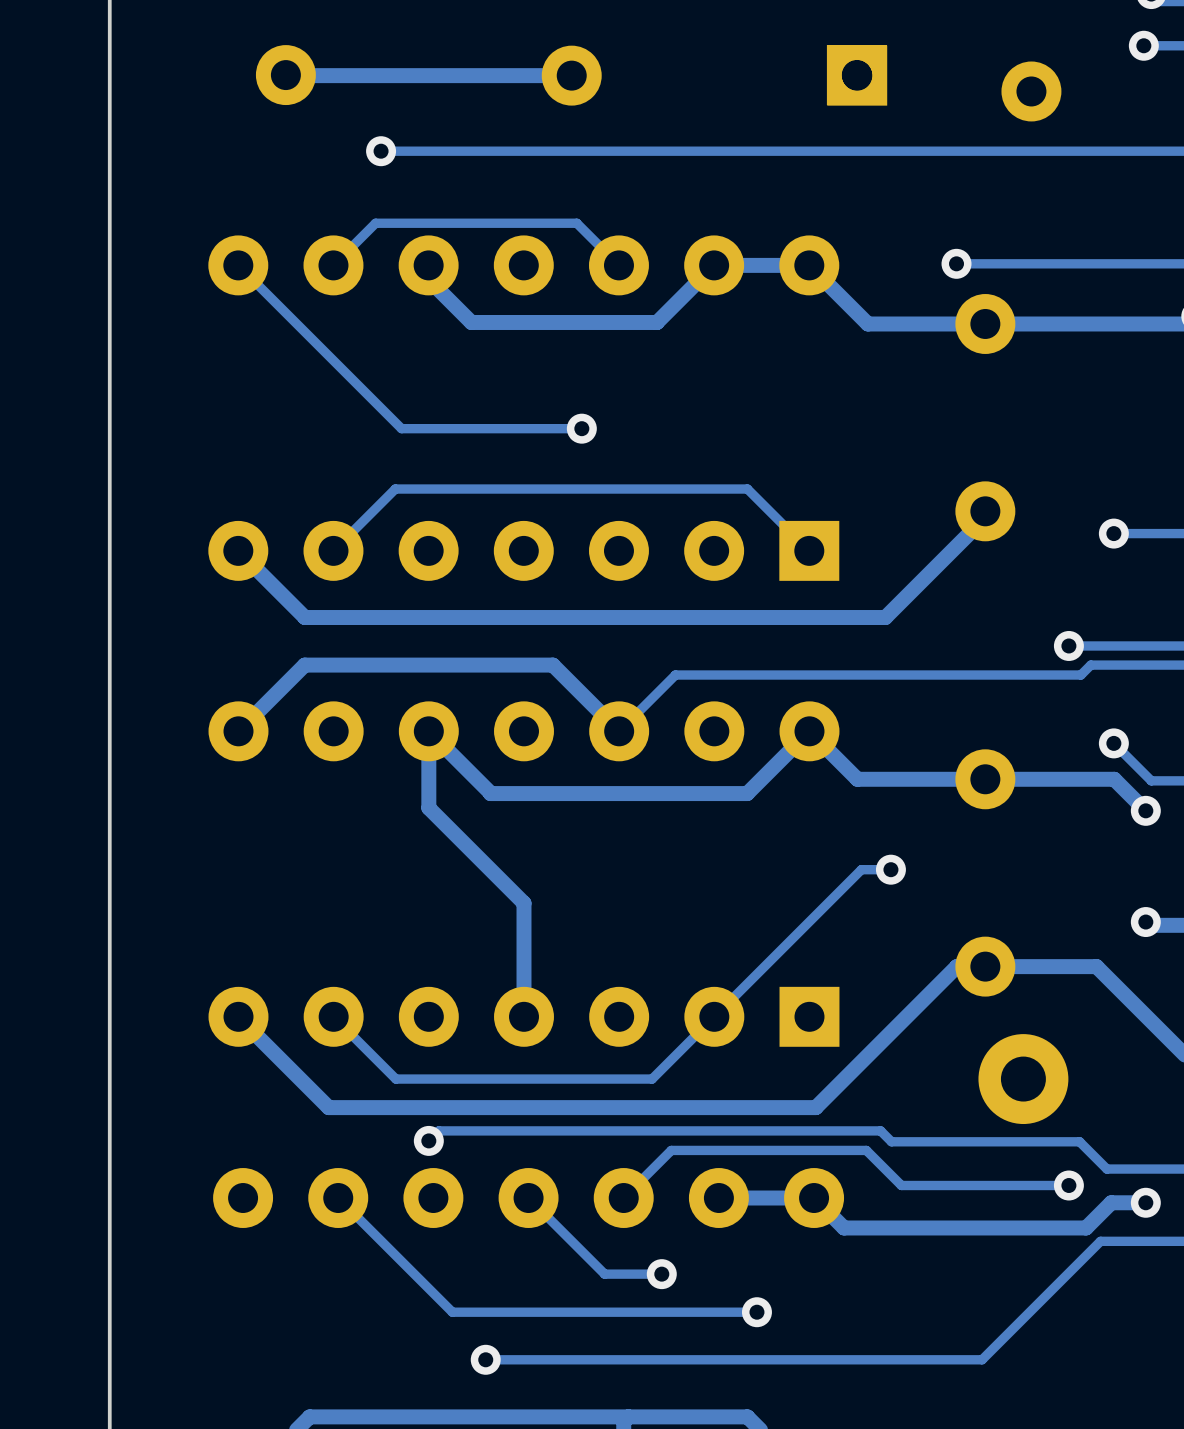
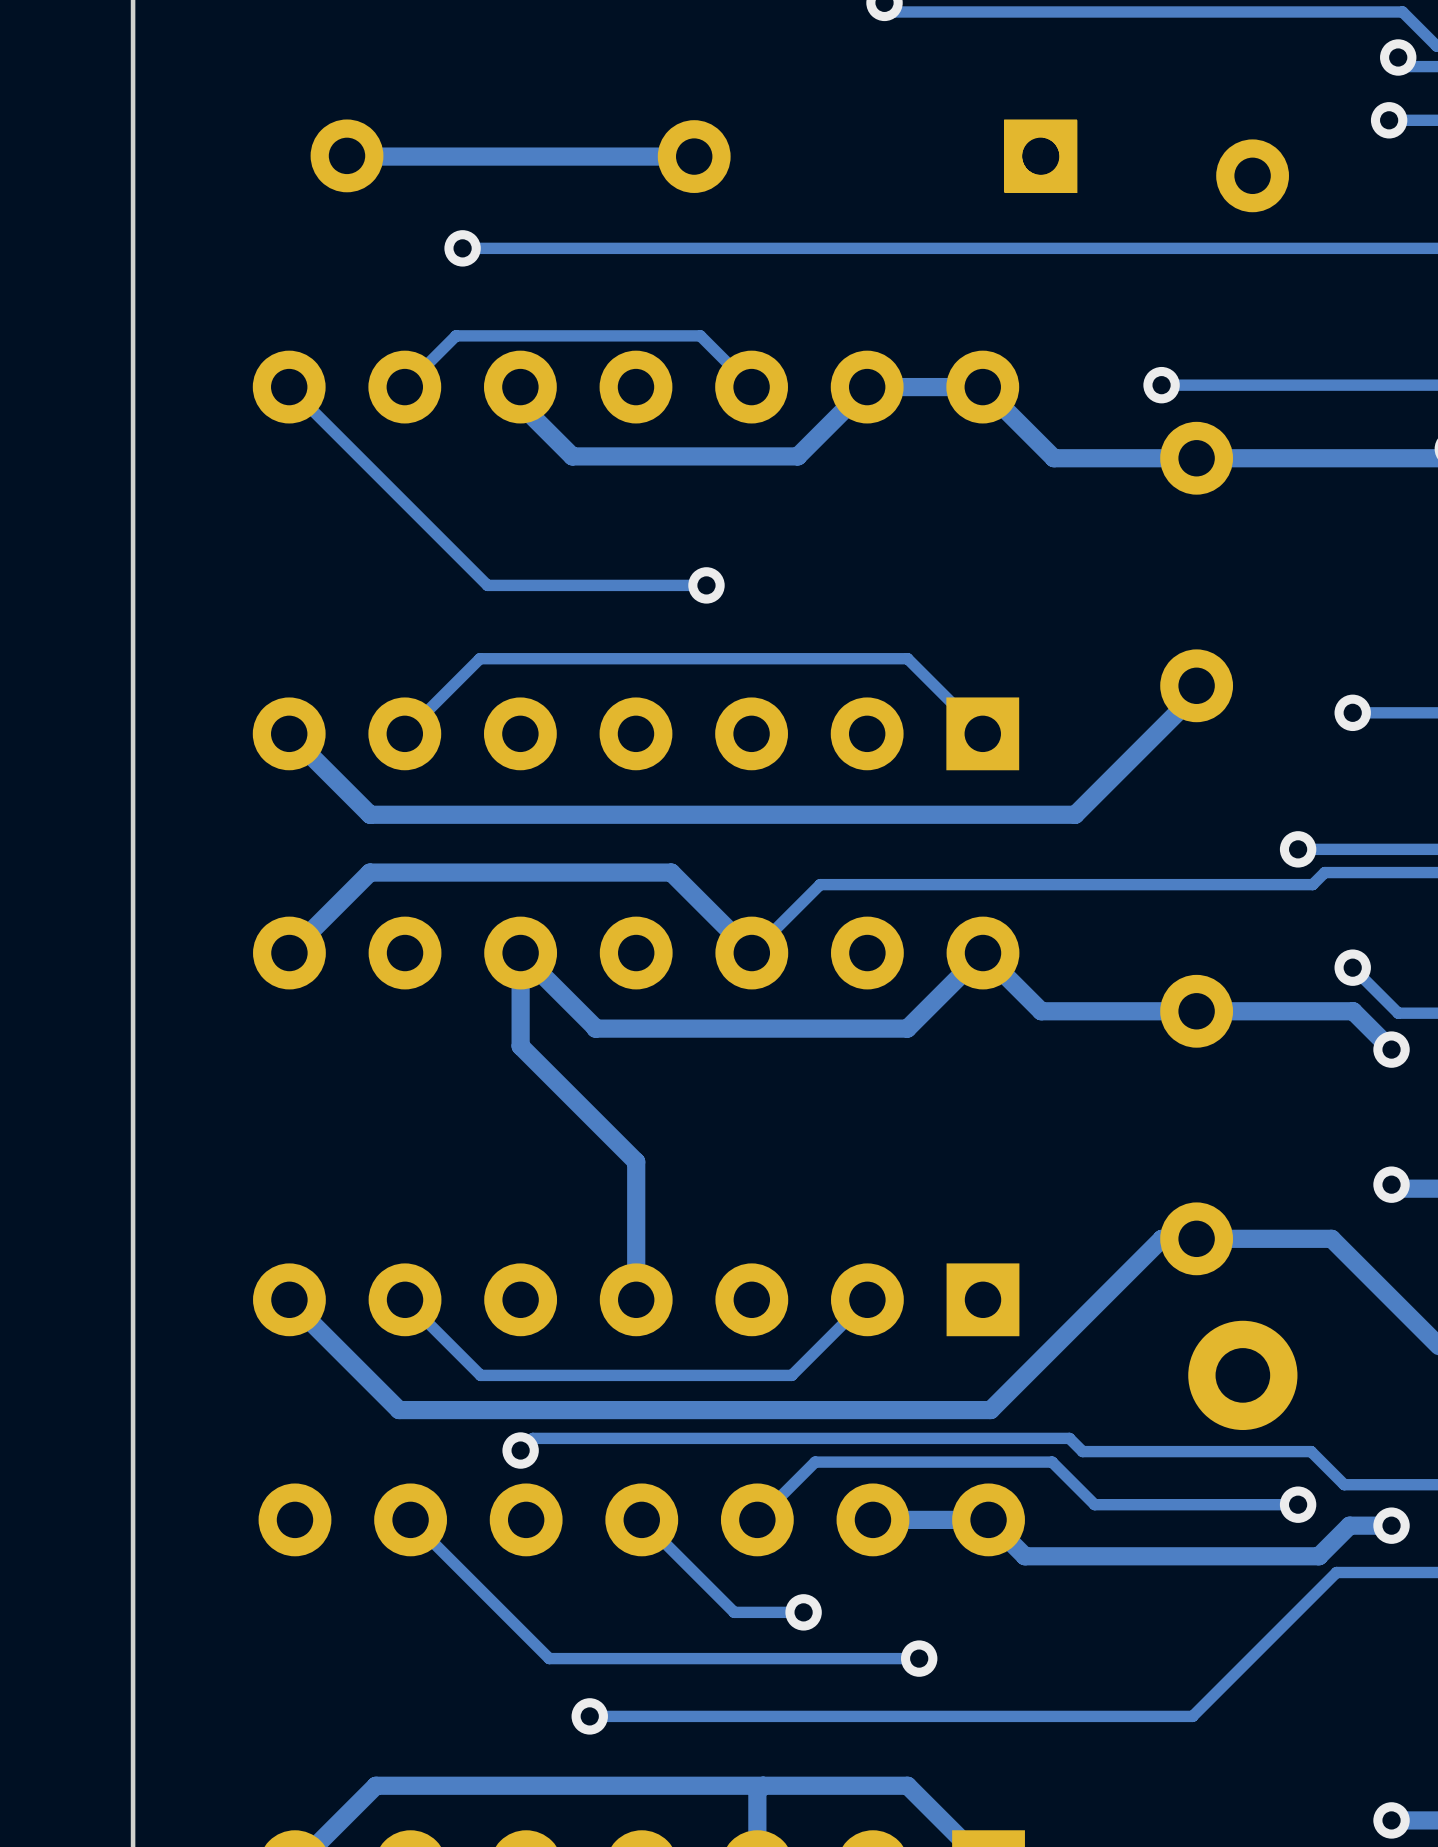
track: (890, 869) (861, 869) (714, 1016) -> none
via: (890, 869) -> none

